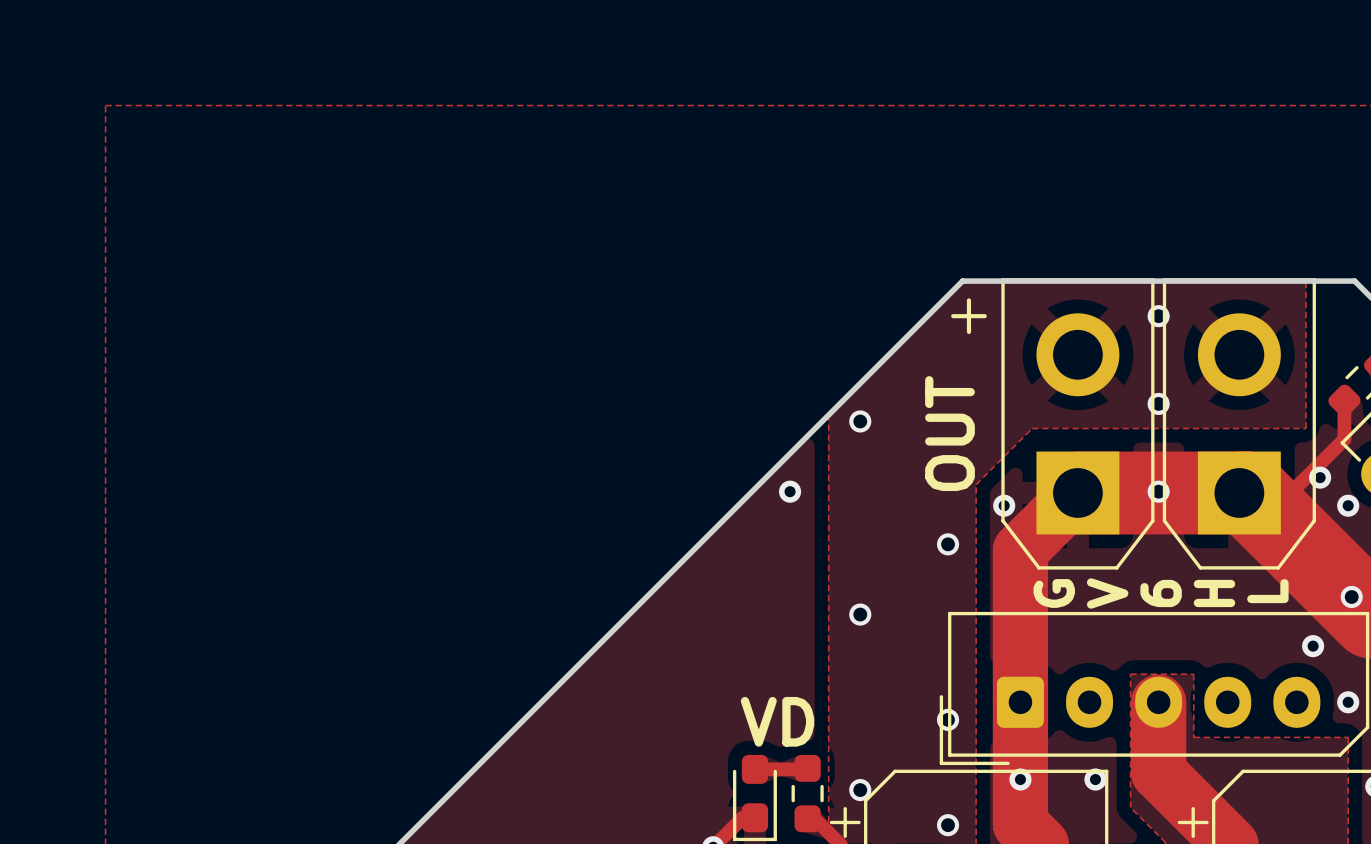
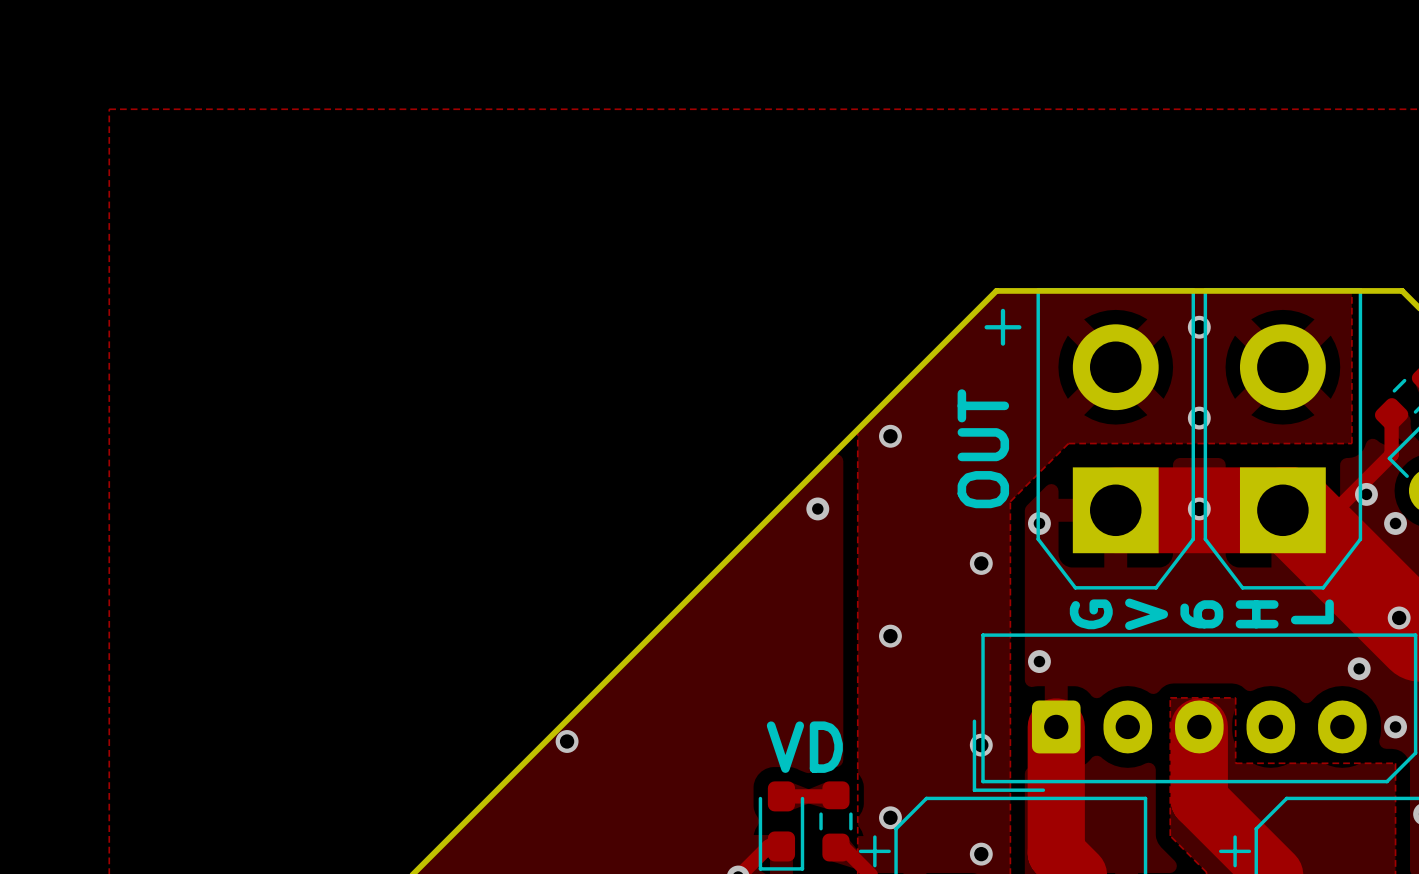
track: (1077, 492) (1020, 550) (1020, 702) -> none
via: none -> (1039, 661)
via: none -> (567, 741)
via: (1020, 779) -> none
via: (1095, 779) -> none

